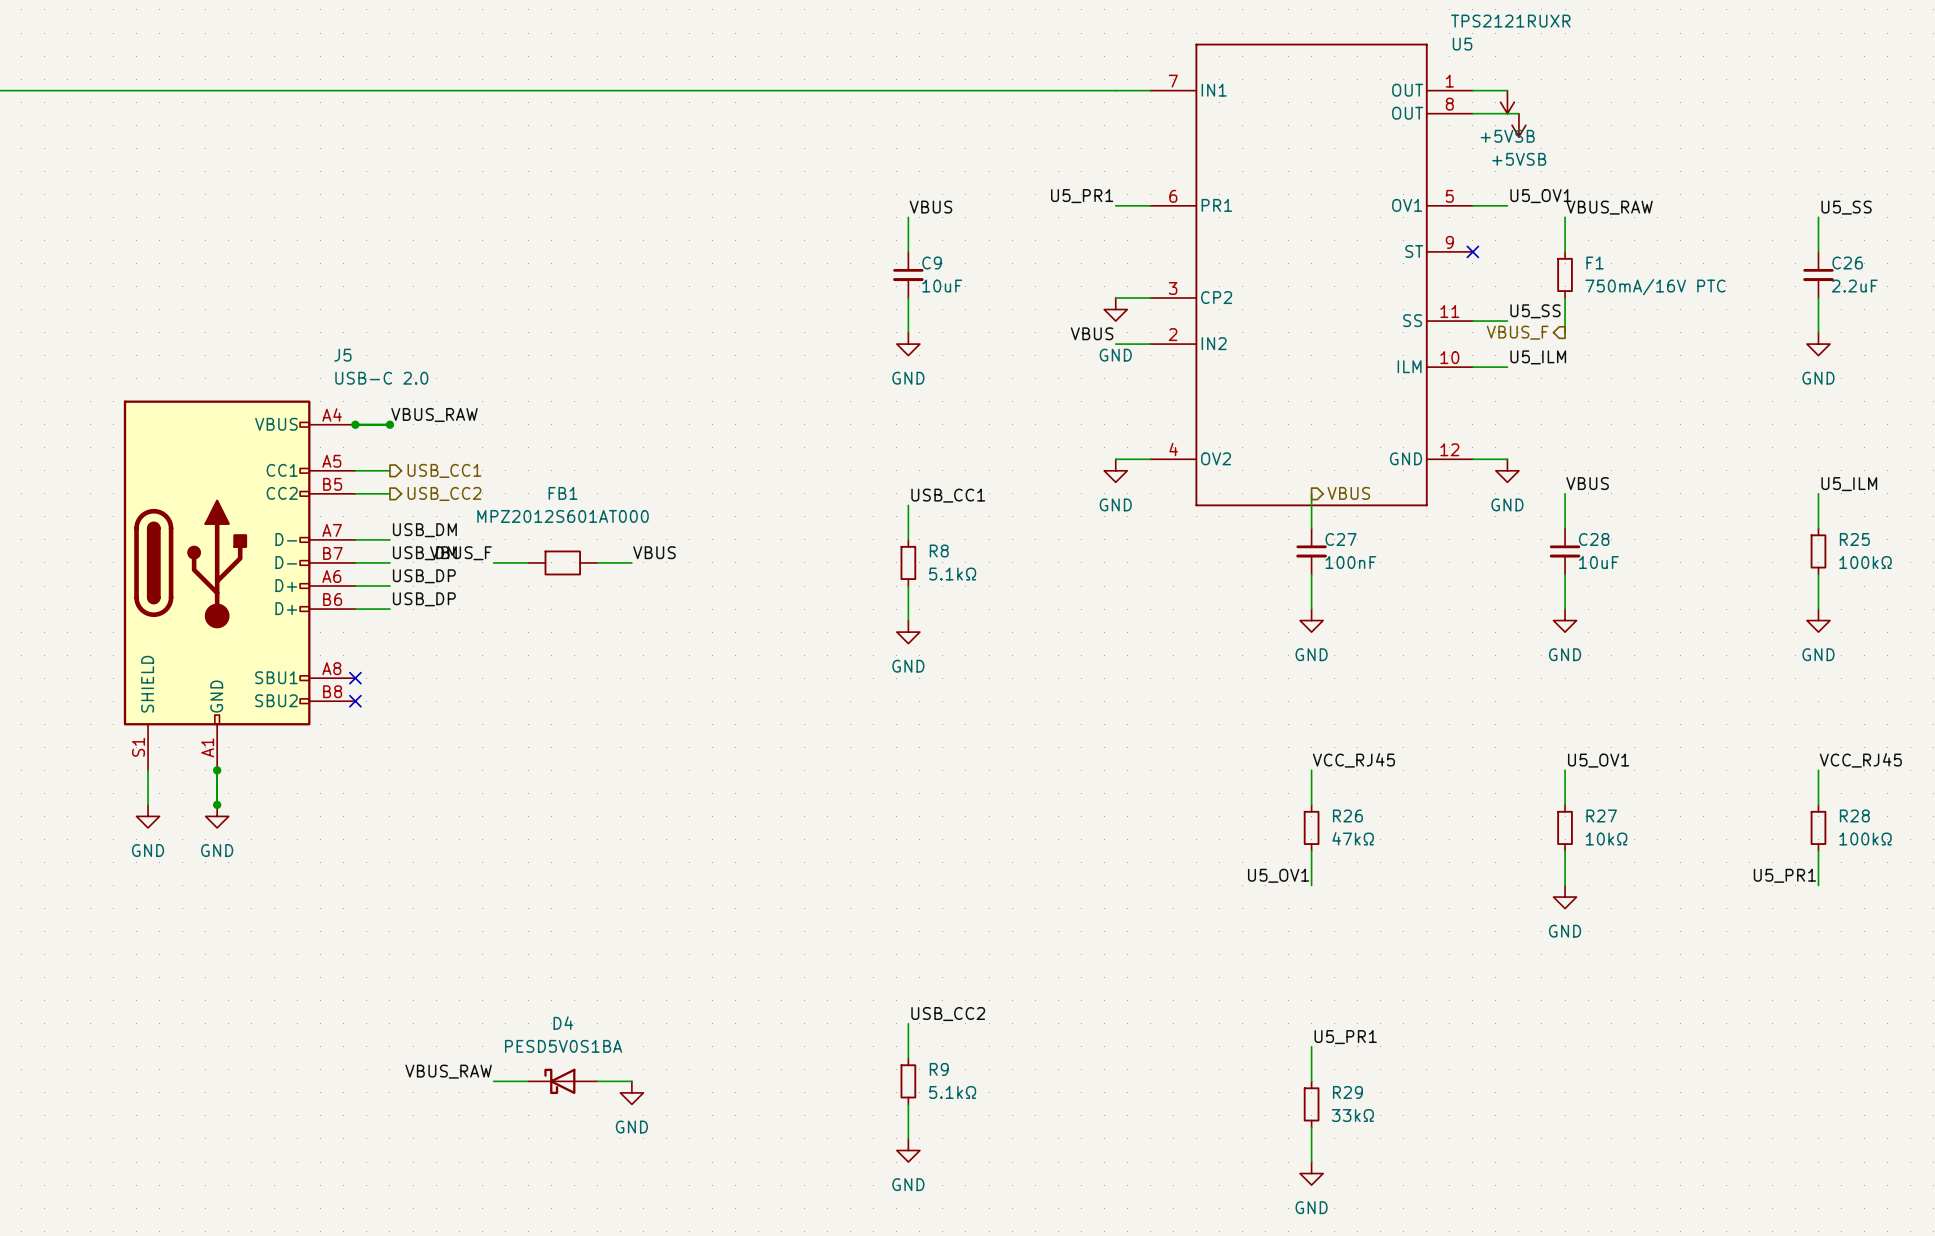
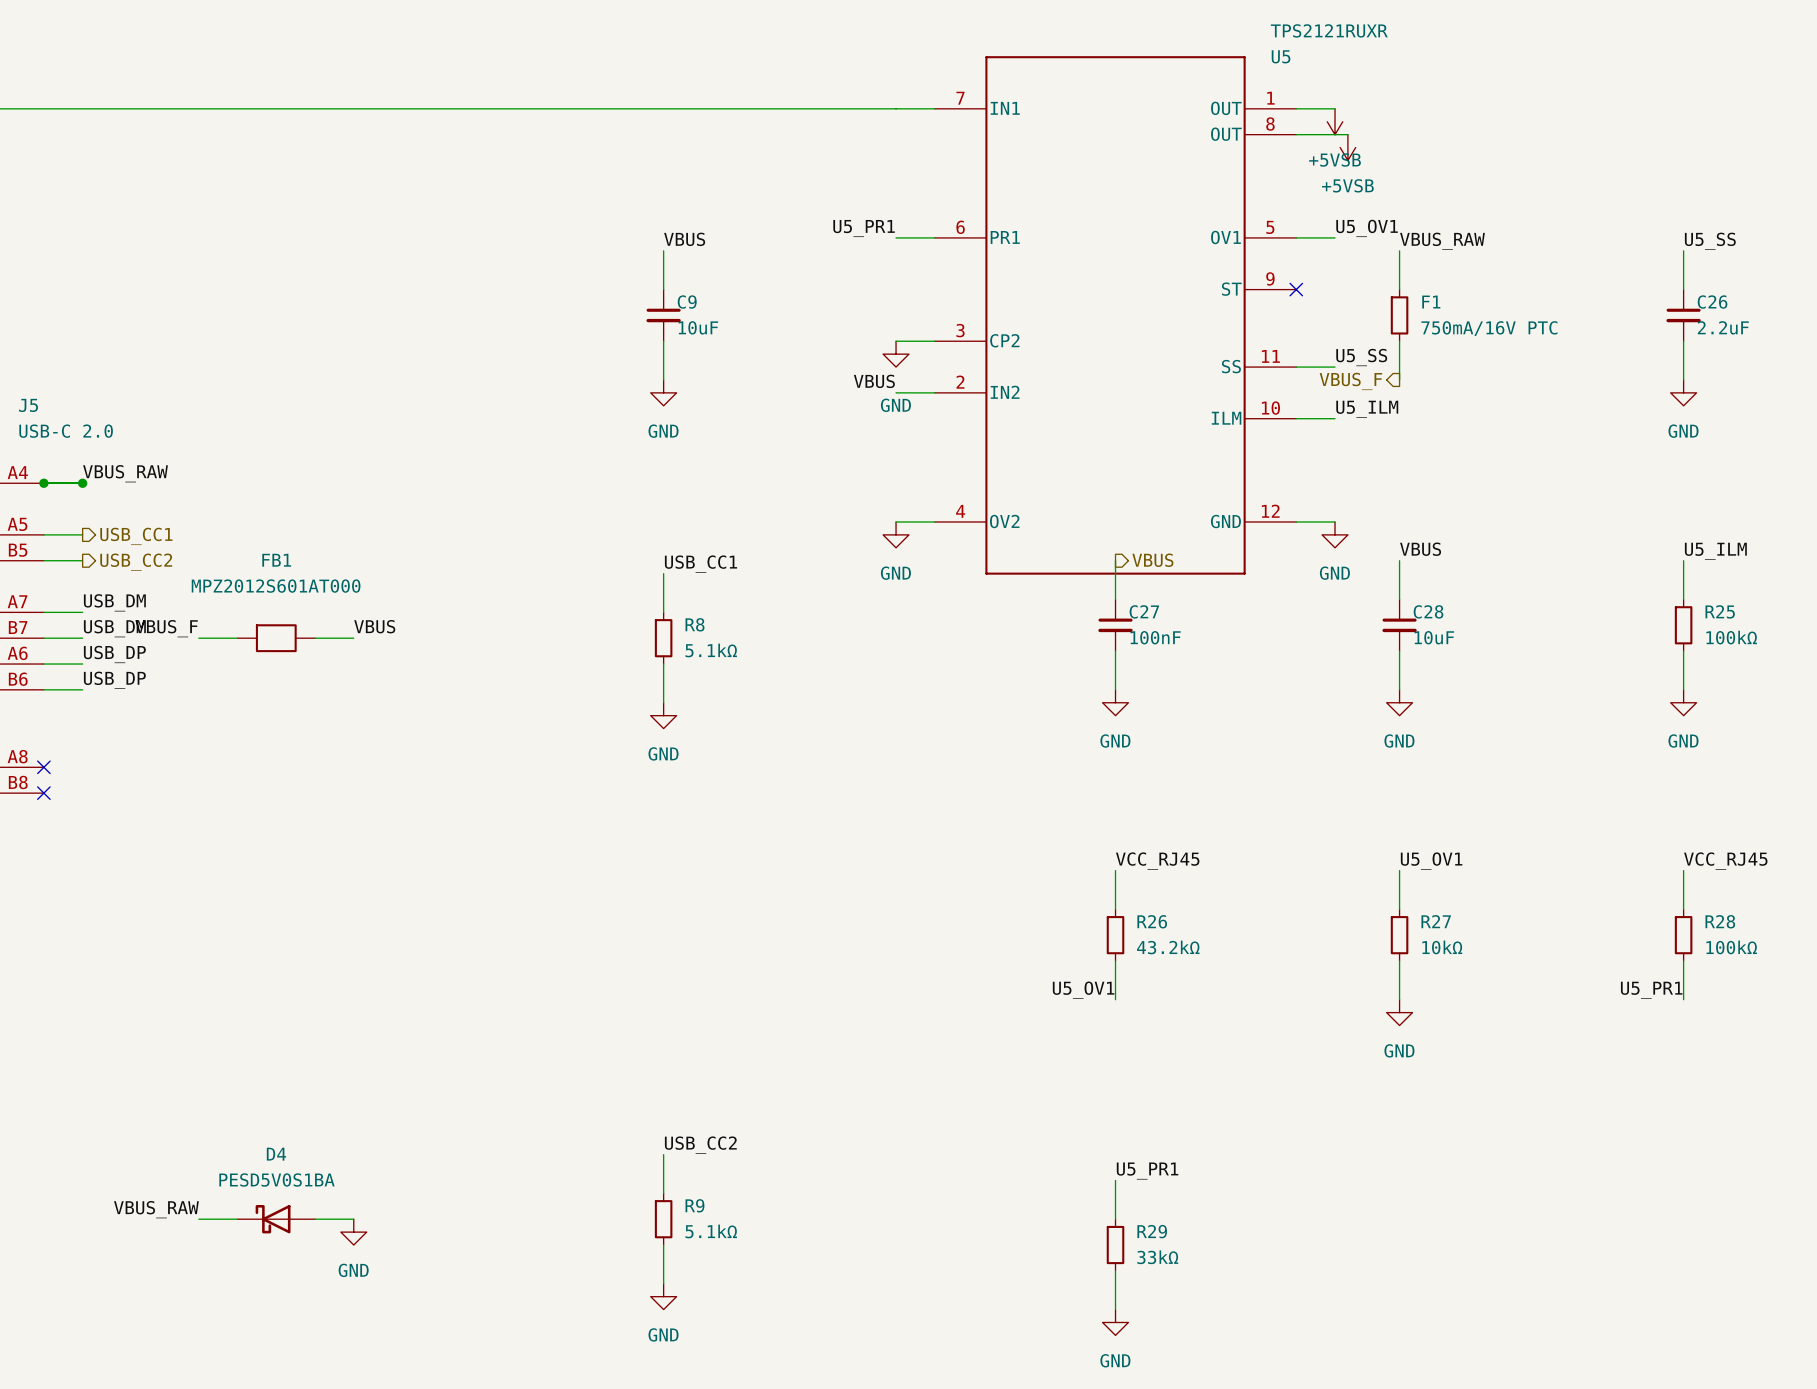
R26 value: 47kΩ (1353, 838) -> 43.2kΩ (1168, 947)

